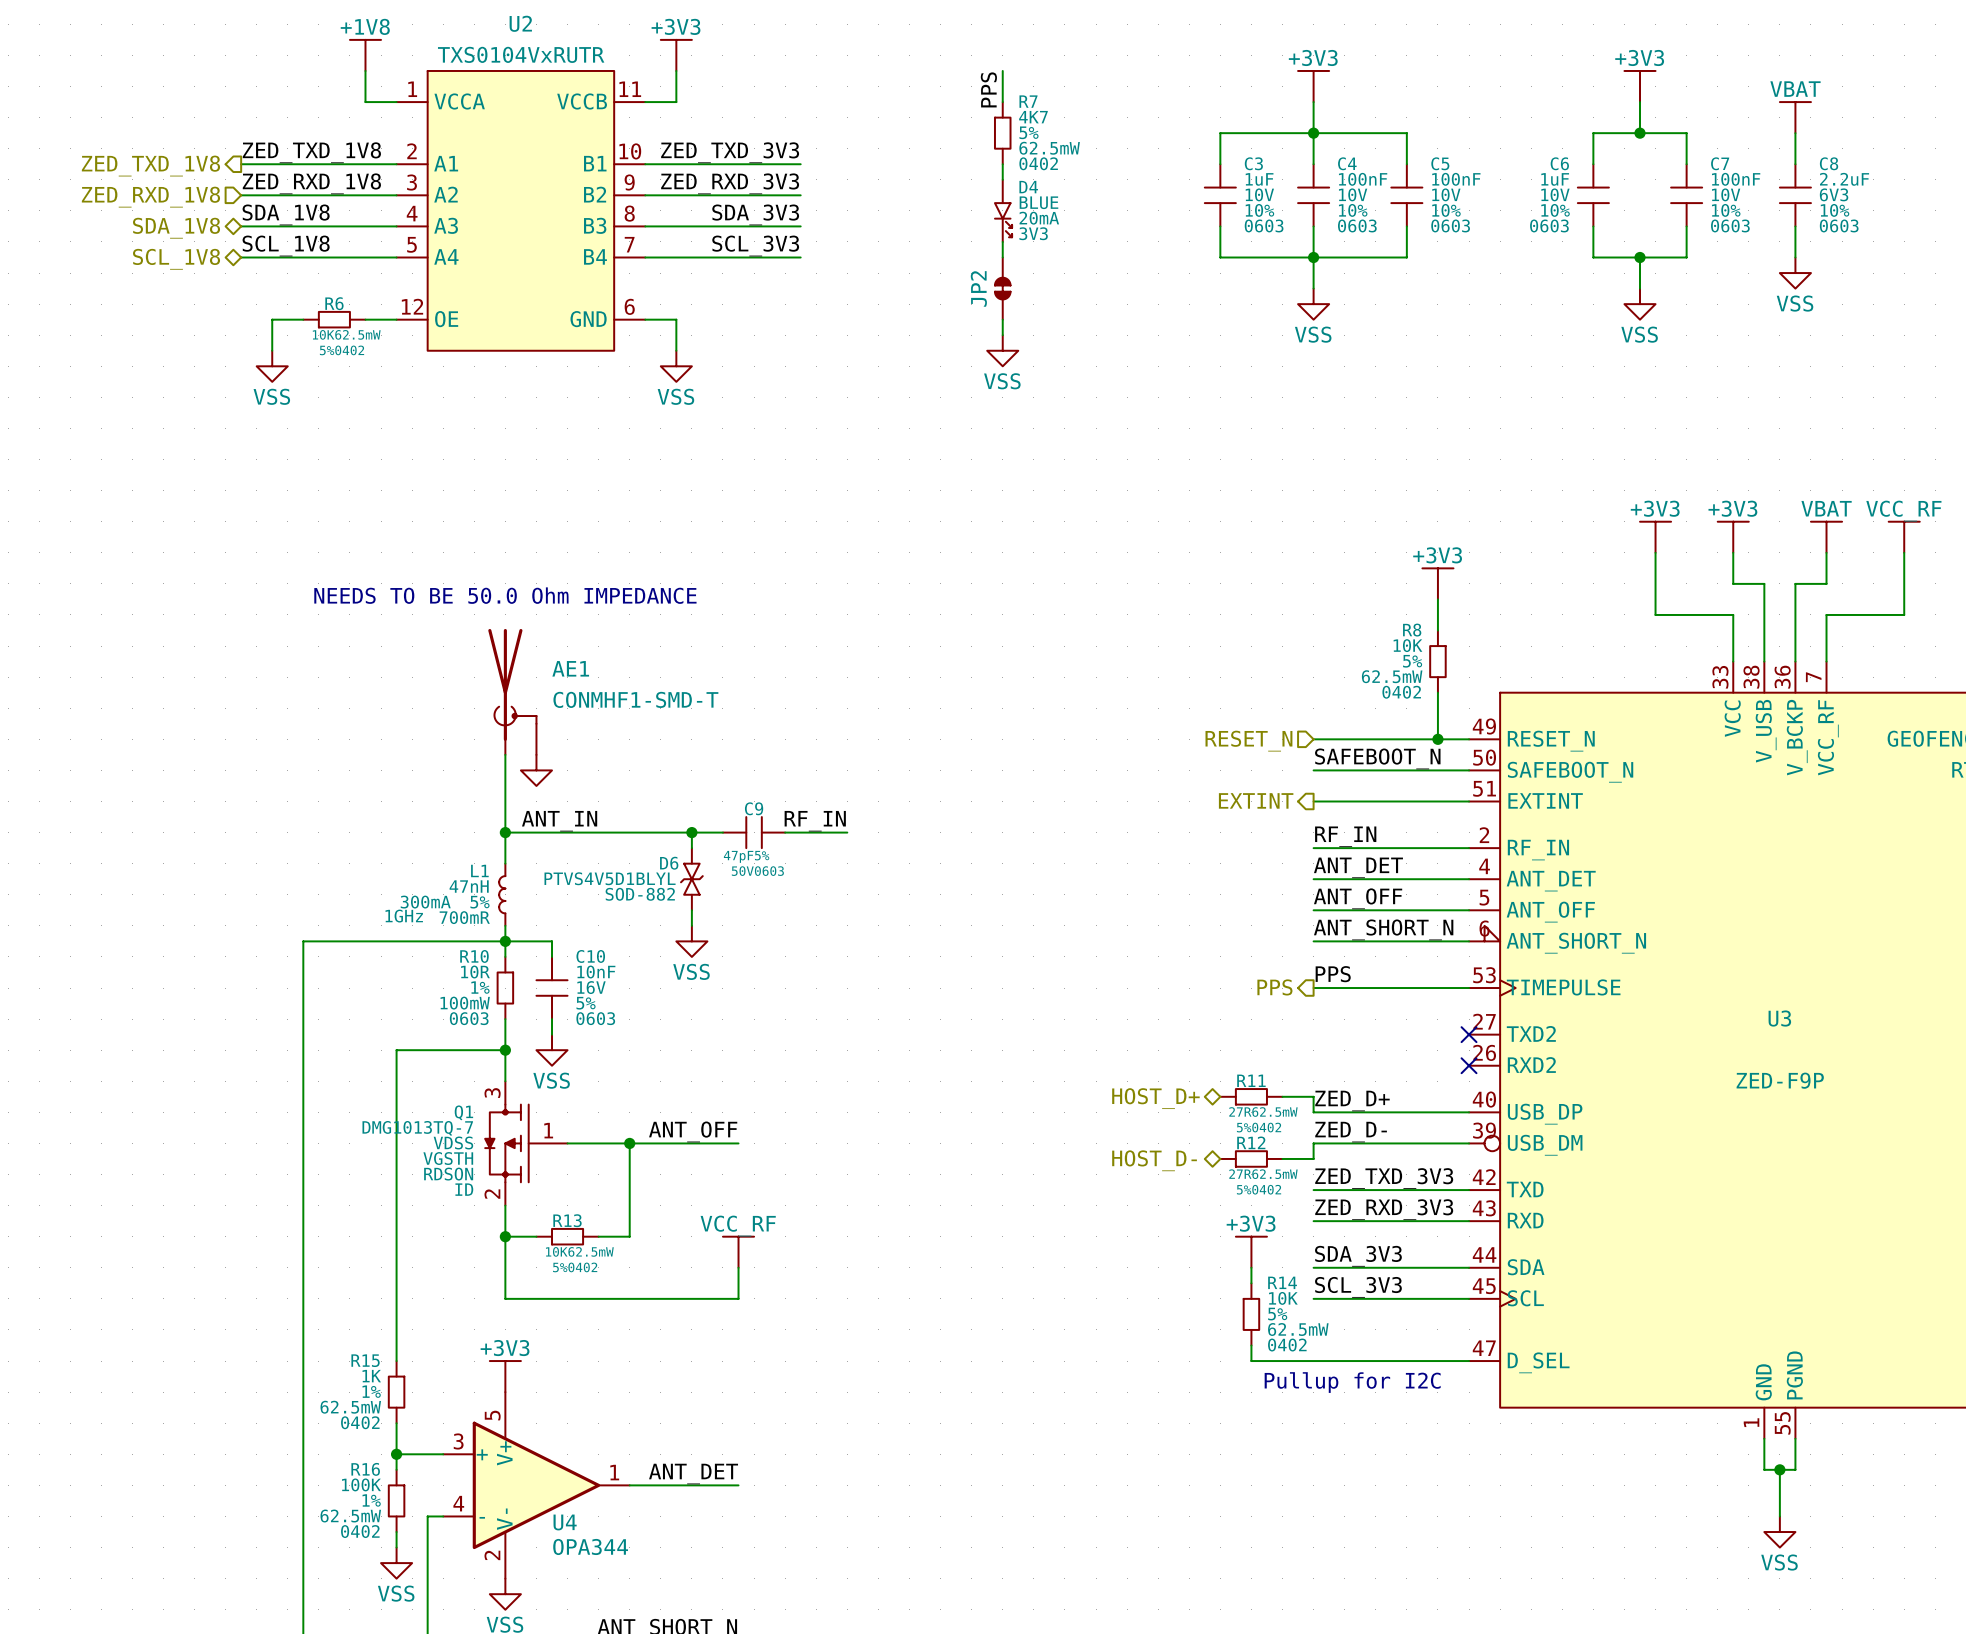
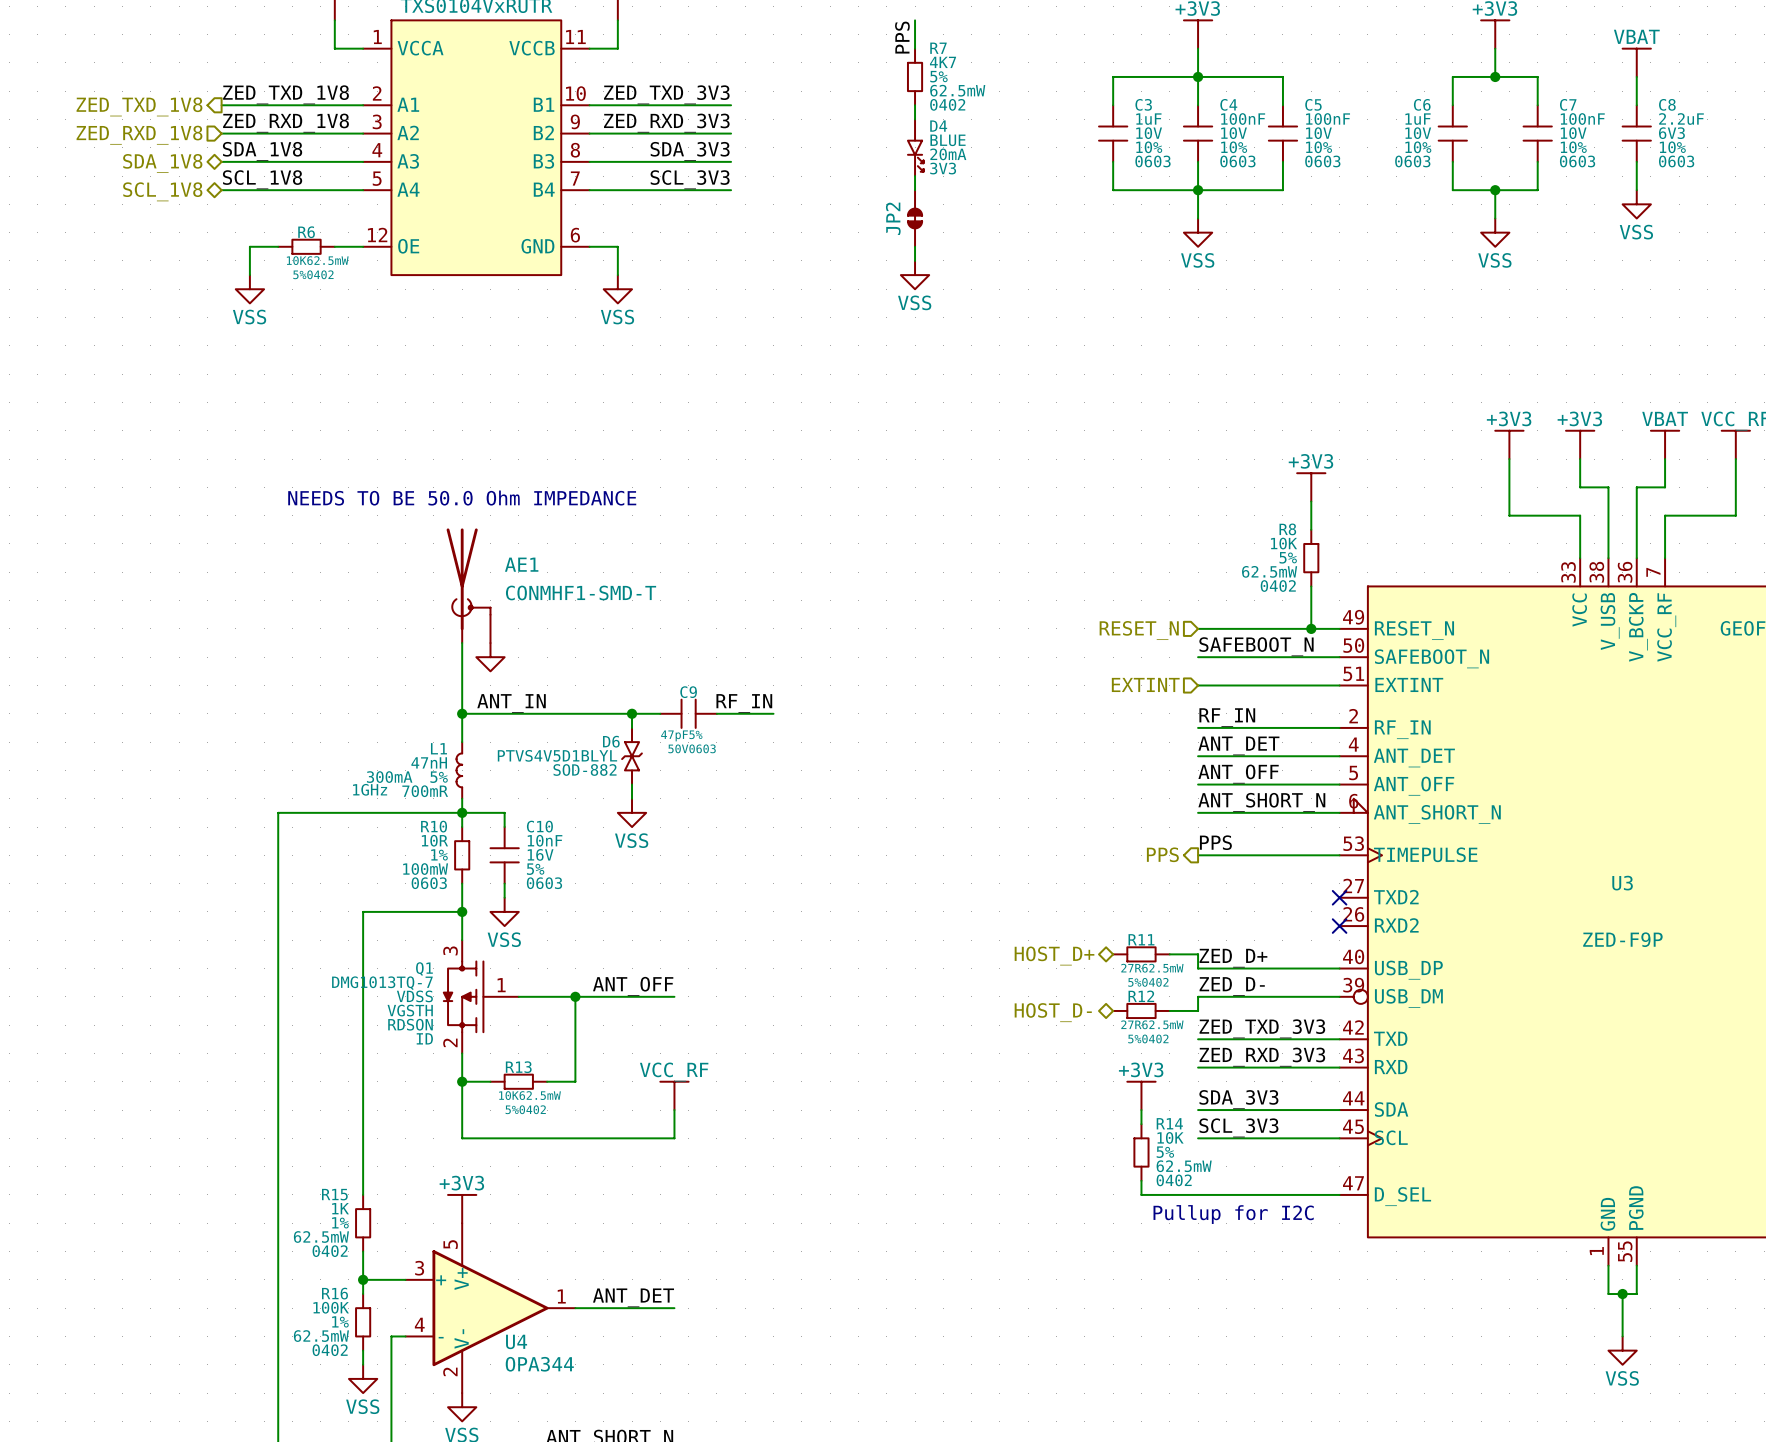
hierarchical label shape: output (1256, 800) -> input (1145, 684)

